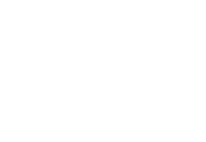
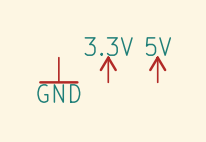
power symbol: none -> 3.3V (108, 69)
power symbol: none -> 5V (157, 69)
power symbol: none -> GND (58, 70)

